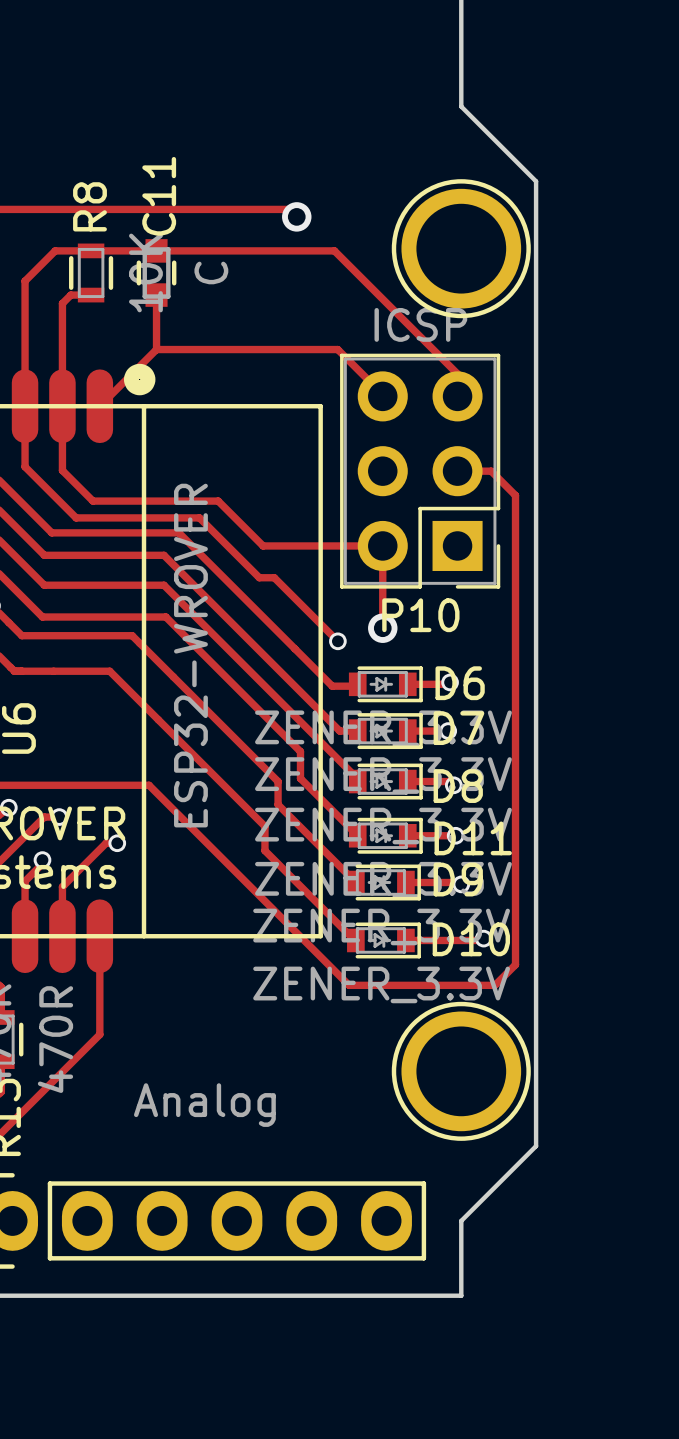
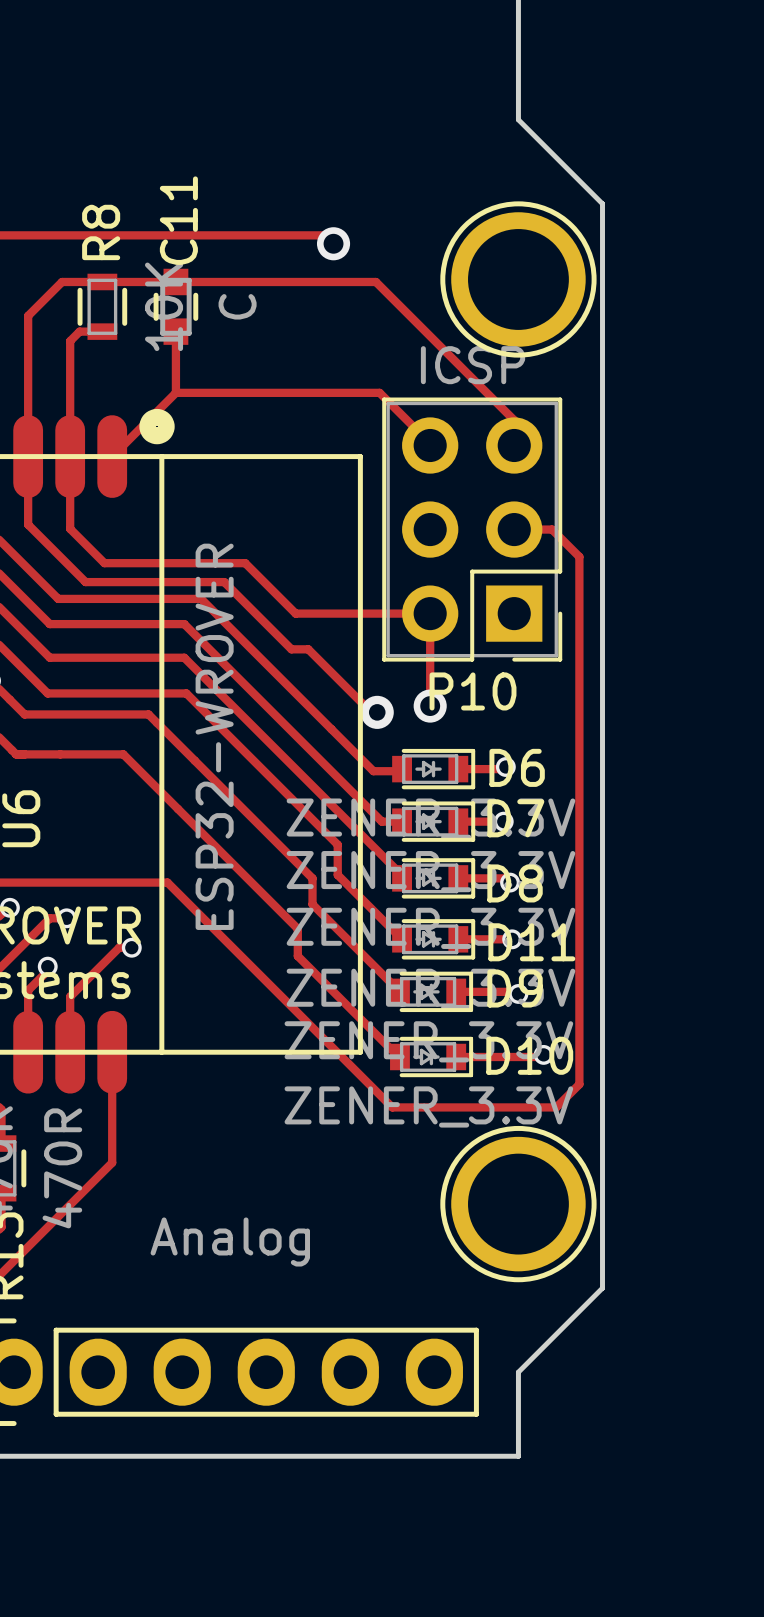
via size: [329, 632, 347, 651] -> [360, 695, 394, 729]

